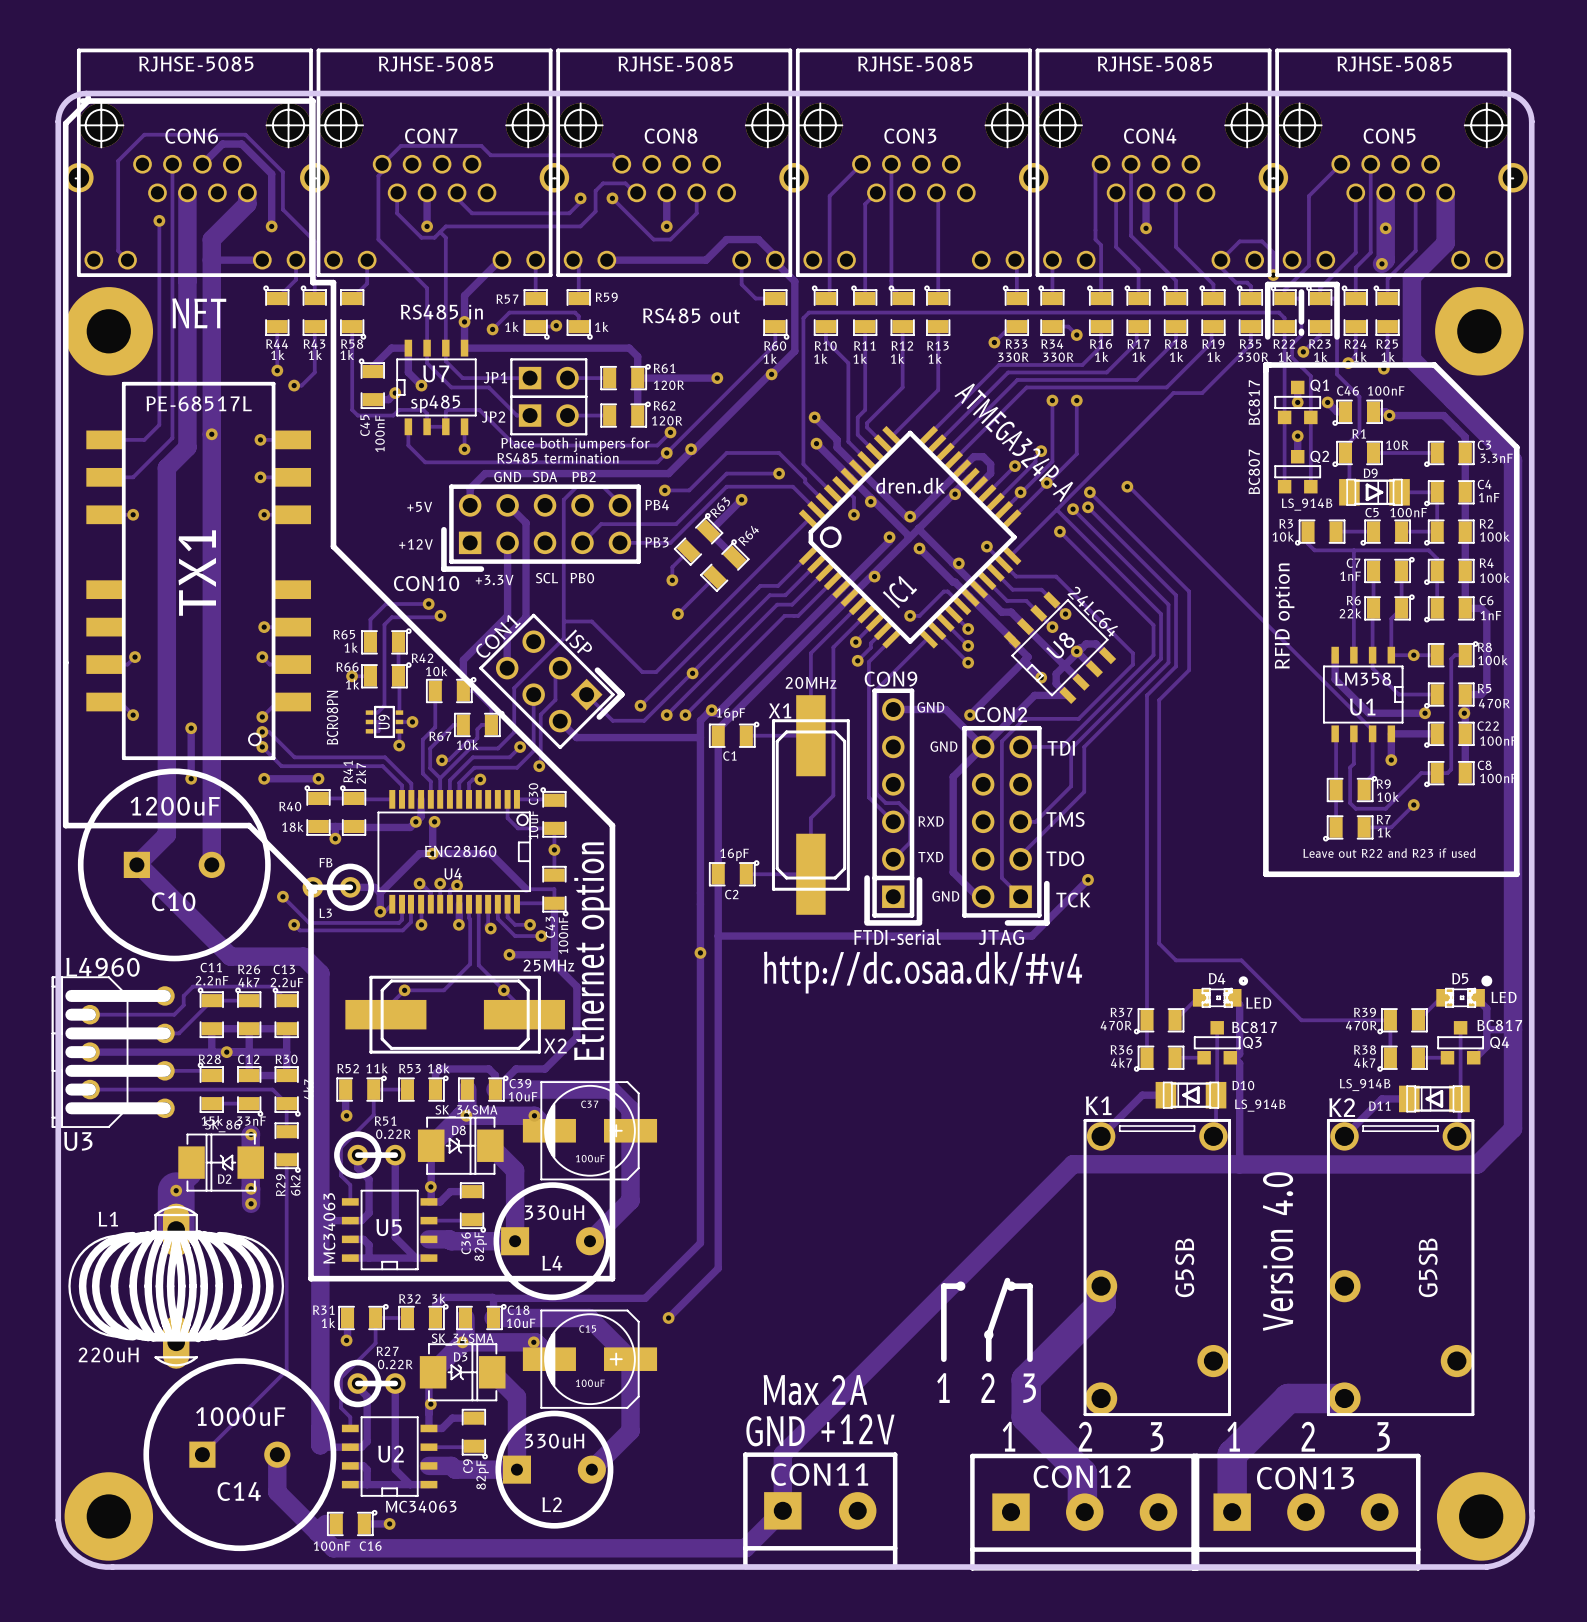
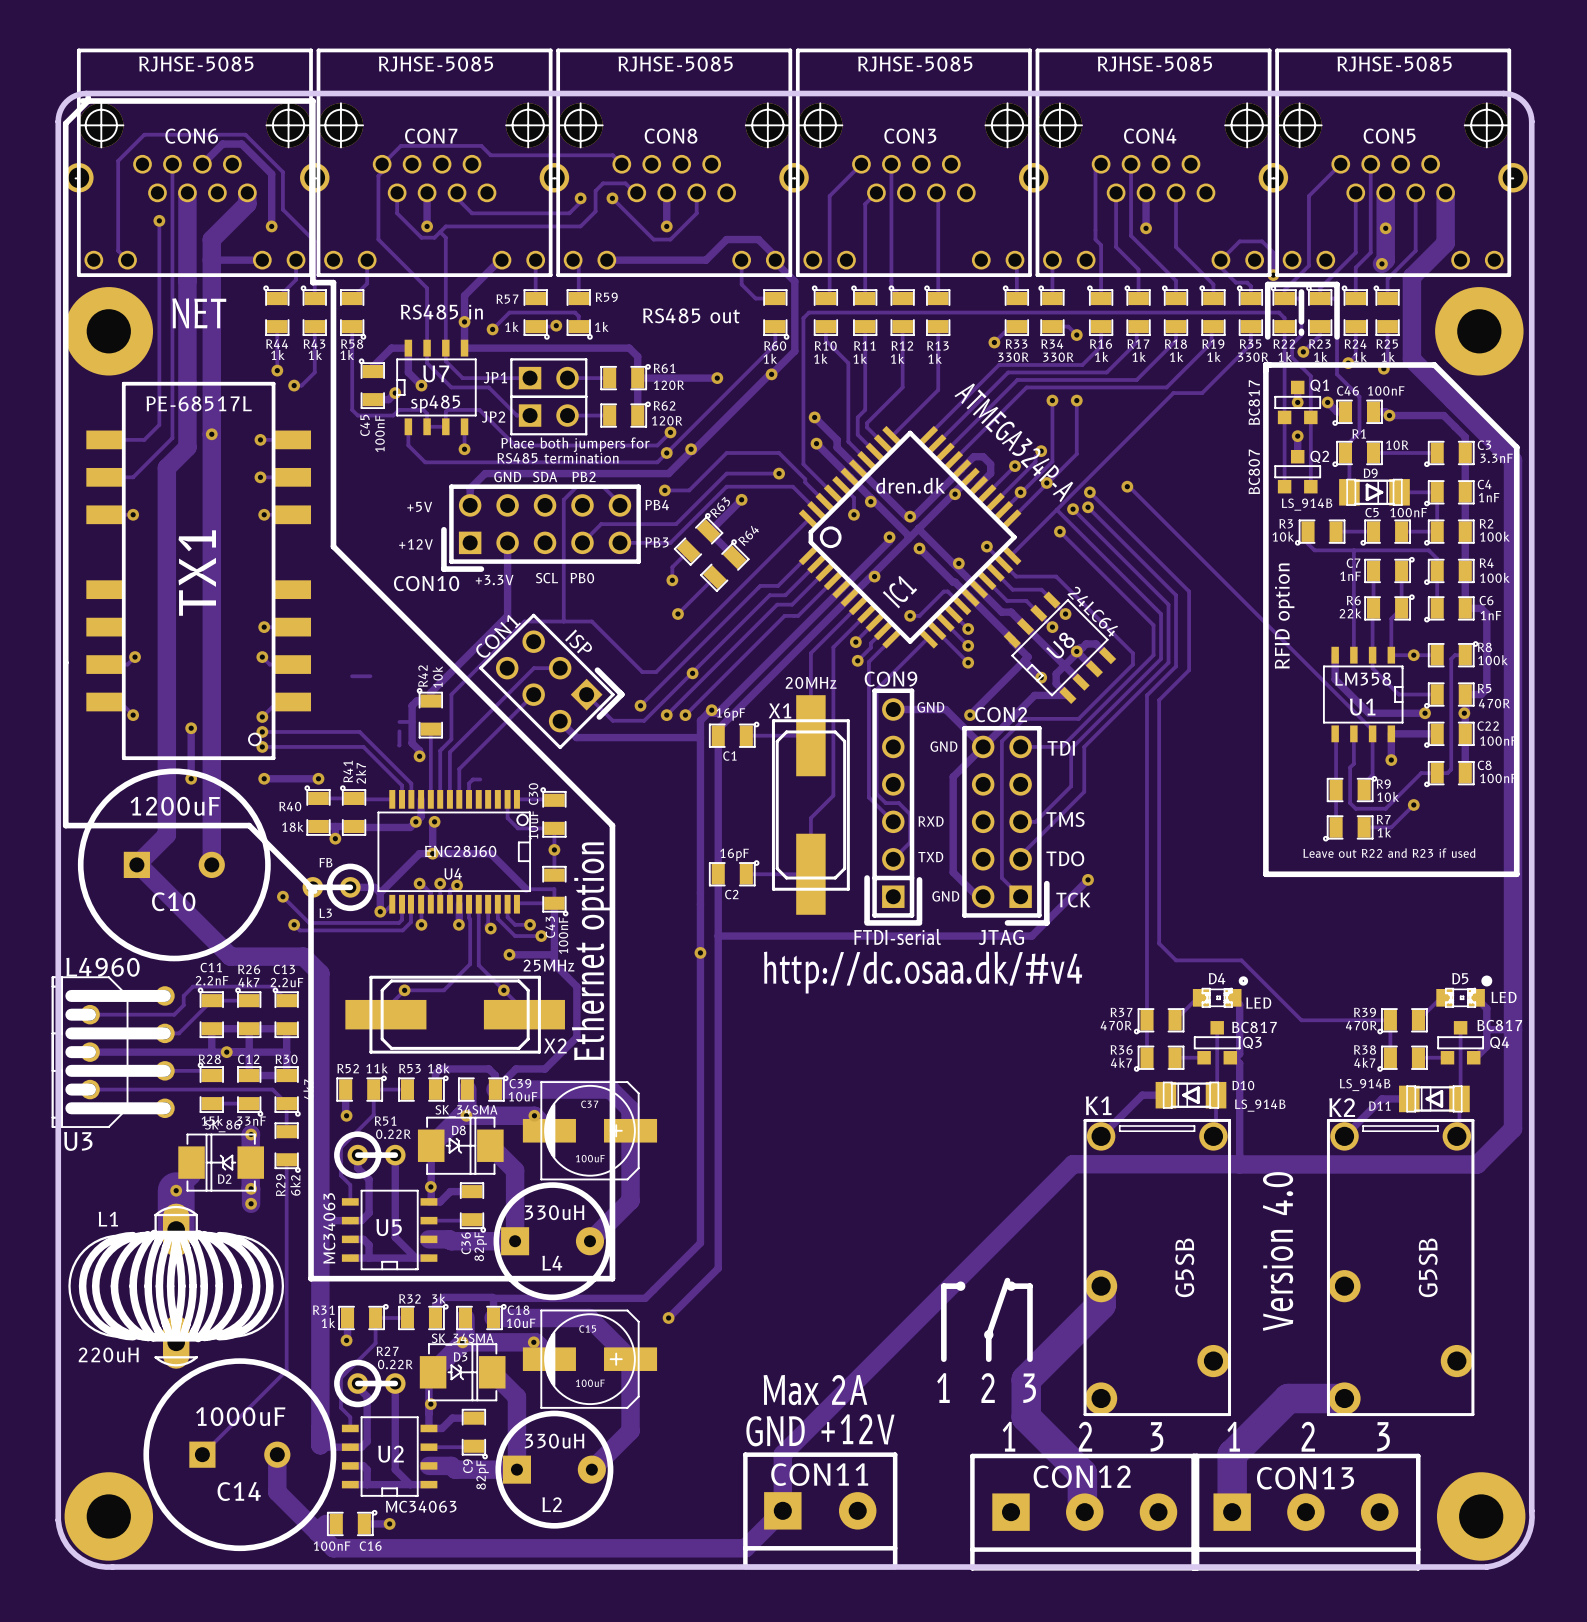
track: (507, 505) (526, 522) (526, 617) (507, 636) (507, 668) -> none
track: (428, 604) (385, 604) (370, 619) (370, 642) -> none
via: (428, 604) -> none
track: (440, 615) (391, 617) (384, 624) (384, 705) (377, 712) (369, 712) -> none
via: (440, 615) -> none
track: (563, 621) (563, 638) (514, 688) (514, 732) (497, 748) (469, 748) (440, 778) (430, 768) (430, 748) (453, 724) (463, 724) -> (563, 621) (524, 621) (451, 694) (451, 739) (440, 750) (440, 778)
R65: 1k (386, 641) -> none
track: (398, 642) (399, 712) -> none
track: (463, 660) (463, 691) (474, 691) (491, 708) (491, 724) (481, 724) (477, 729) (477, 738) (474, 741) (467, 741) (448, 760) (441, 760) -> (463, 660) (430, 692) (430, 701) (416, 701) (412, 705) (412, 743) (419, 750) (419, 756)
track: (560, 668) (555, 672) (555, 699) (540, 714) (539, 766) -> none
R66: 1k (386, 675) -> none
via: (352, 676) -> none
R42 rotation: 0° (451, 690) -> 90° counterclockwise (429, 713)
R42 position: (451, 690) -> (429, 713)
track: (435, 691) (435, 727) (422, 739) (422, 773) (430, 781) -> (430, 729) (430, 781)
track: (533, 694) (533, 751) (517, 767) (474, 767) (459, 782) -> (533, 694) (459, 769) (459, 782)
track: (369, 721) (378, 721) (378, 730) (369, 731) -> none
U9: BCR08PN (384, 721) -> none
via: (412, 721) -> none
R67: 10k (479, 723) -> none
track: (269, 731) (294, 757) (385, 757) -> (269, 731) (359, 731) (385, 757)
via: (399, 745) -> none
track: (262, 746) (281, 766) (382, 766) -> (262, 746) (363, 746) (382, 766)
track: (520, 747) (509, 757) (472, 757) (449, 780) -> (560, 668) (533, 668) (449, 752) (449, 780)
via: (520, 747) -> none
via: none -> (419, 756)
via: (441, 760) -> none
via: (539, 766) -> none
via: (480, 779) -> none

